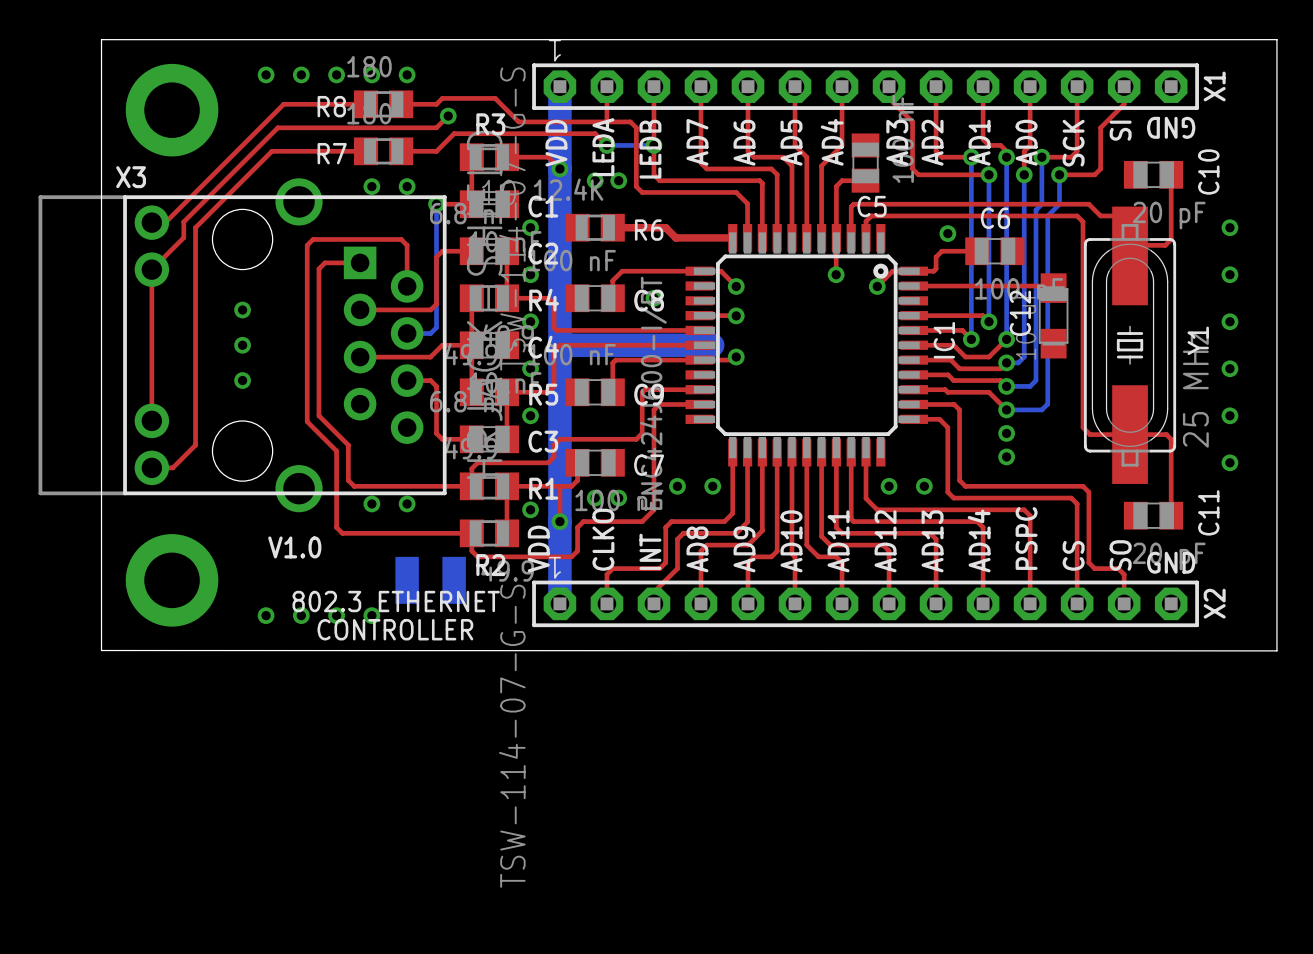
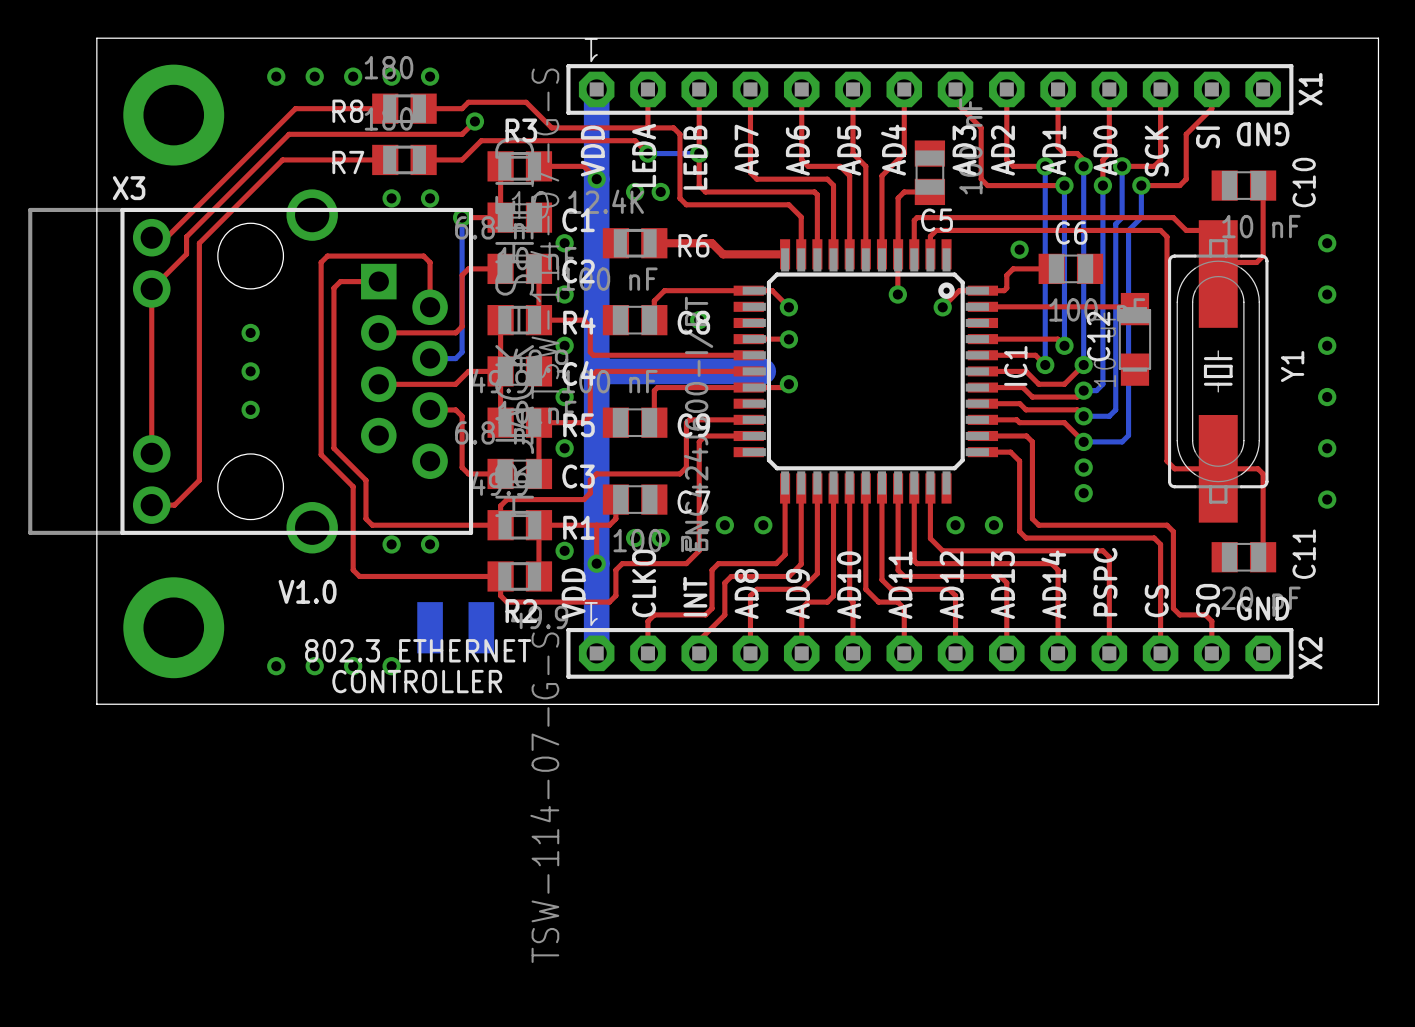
C10 value: 20 pF (1169, 215) -> 10 nF (1261, 226)
Y1 value: 25 MHz (1195, 389) -> none

